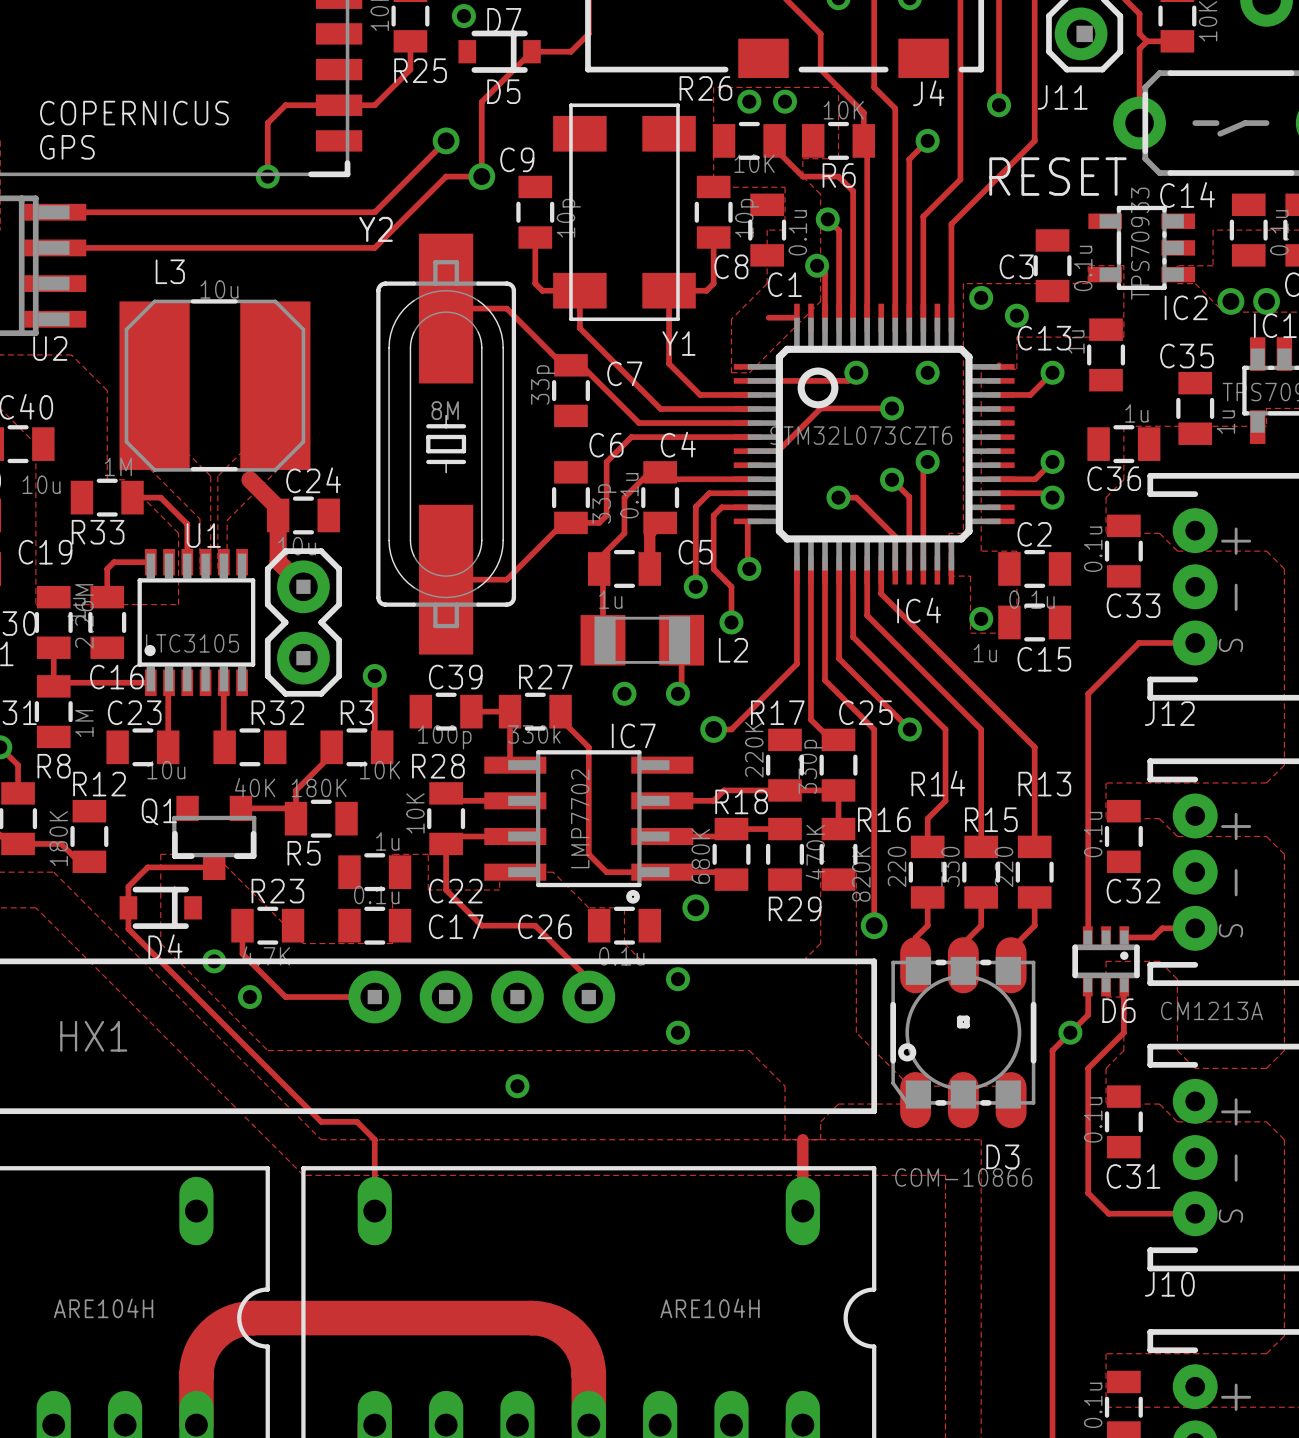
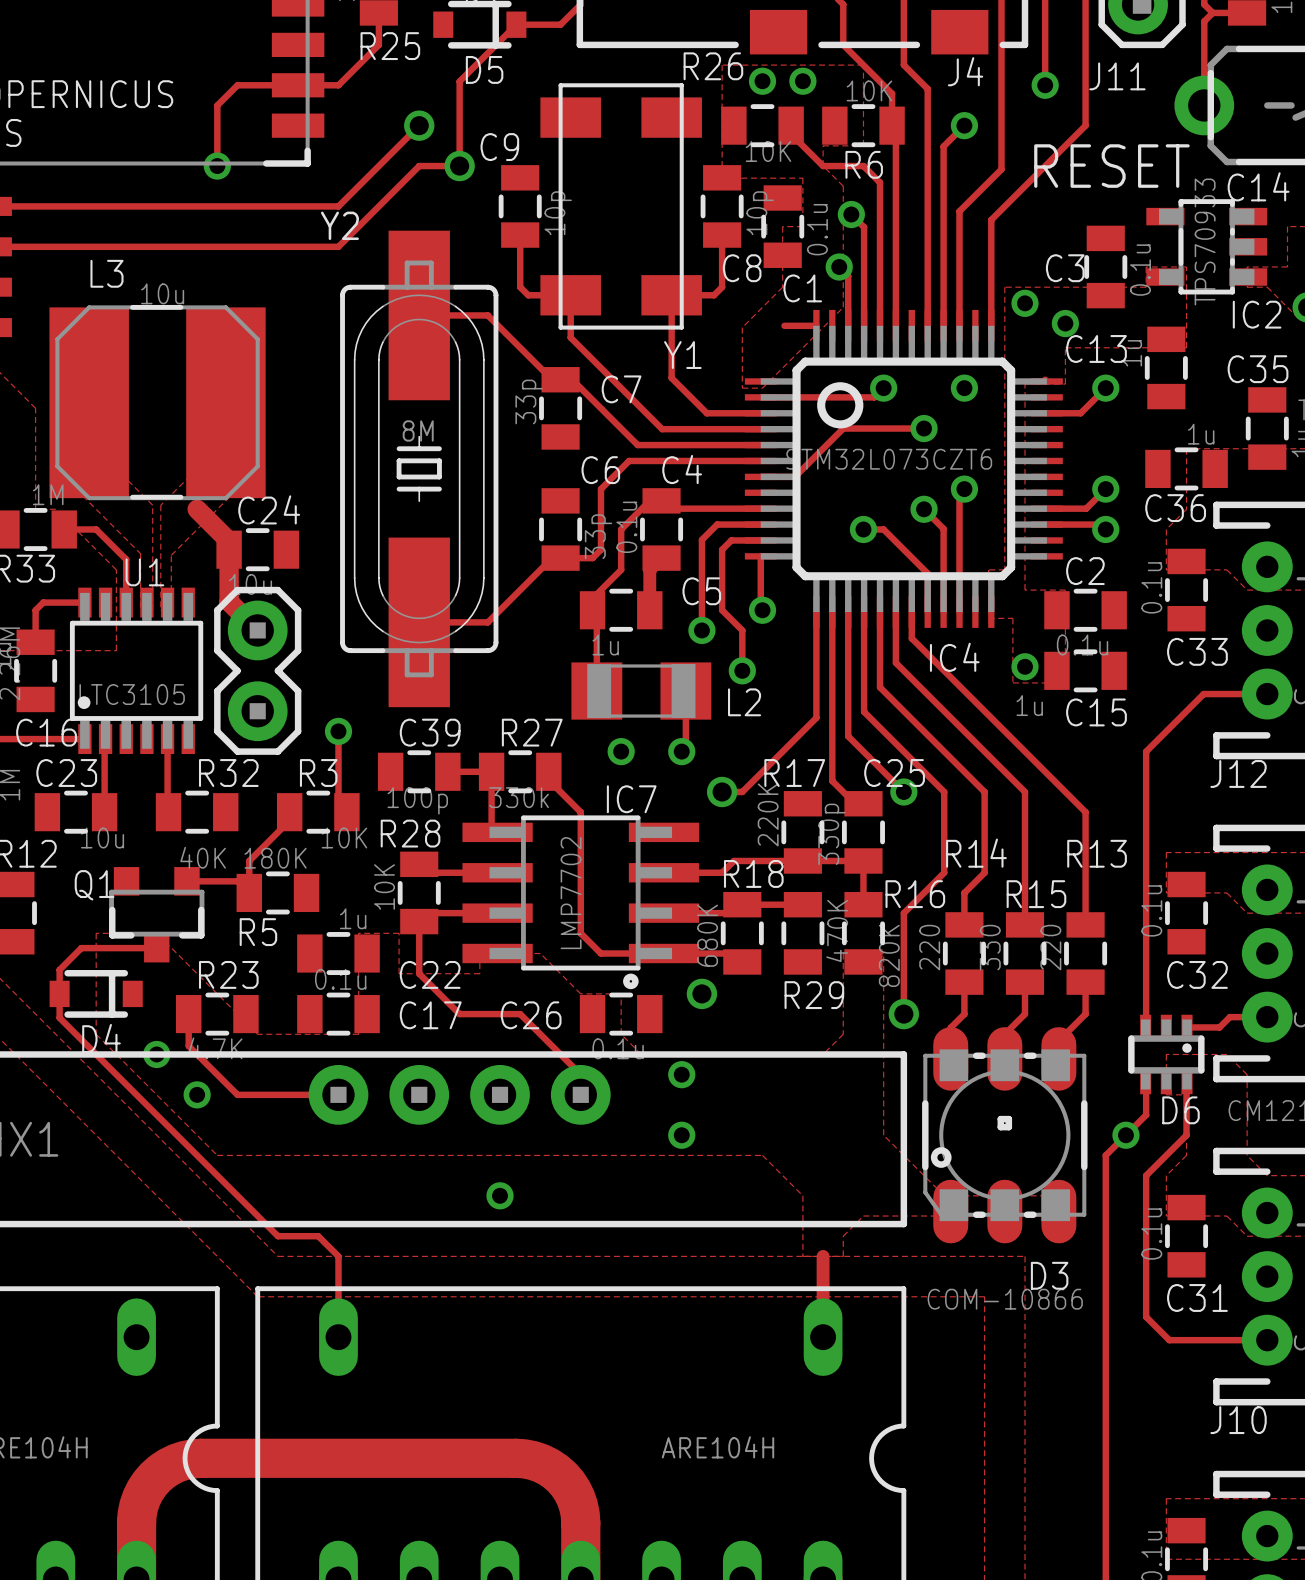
track: (874, 729) (874, 836) -> (944, 791) (944, 872) (903, 913)
via position: (909, 729) -> (903, 791)

